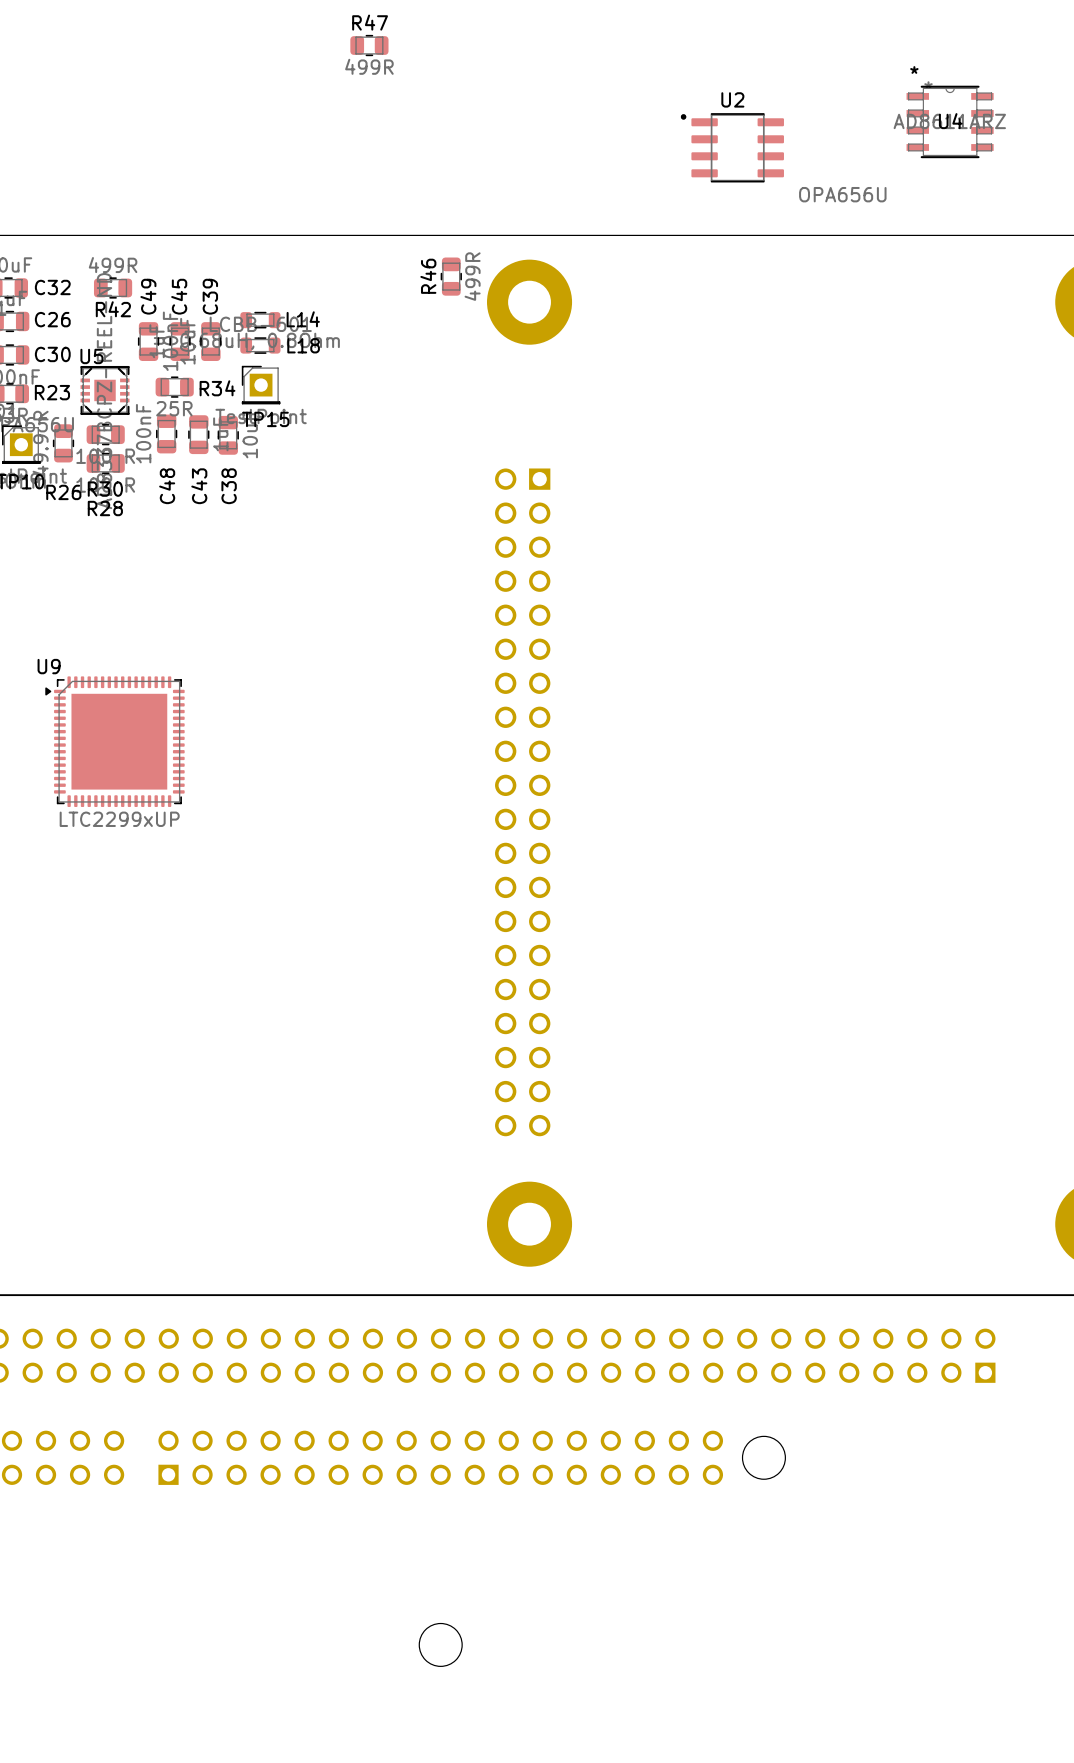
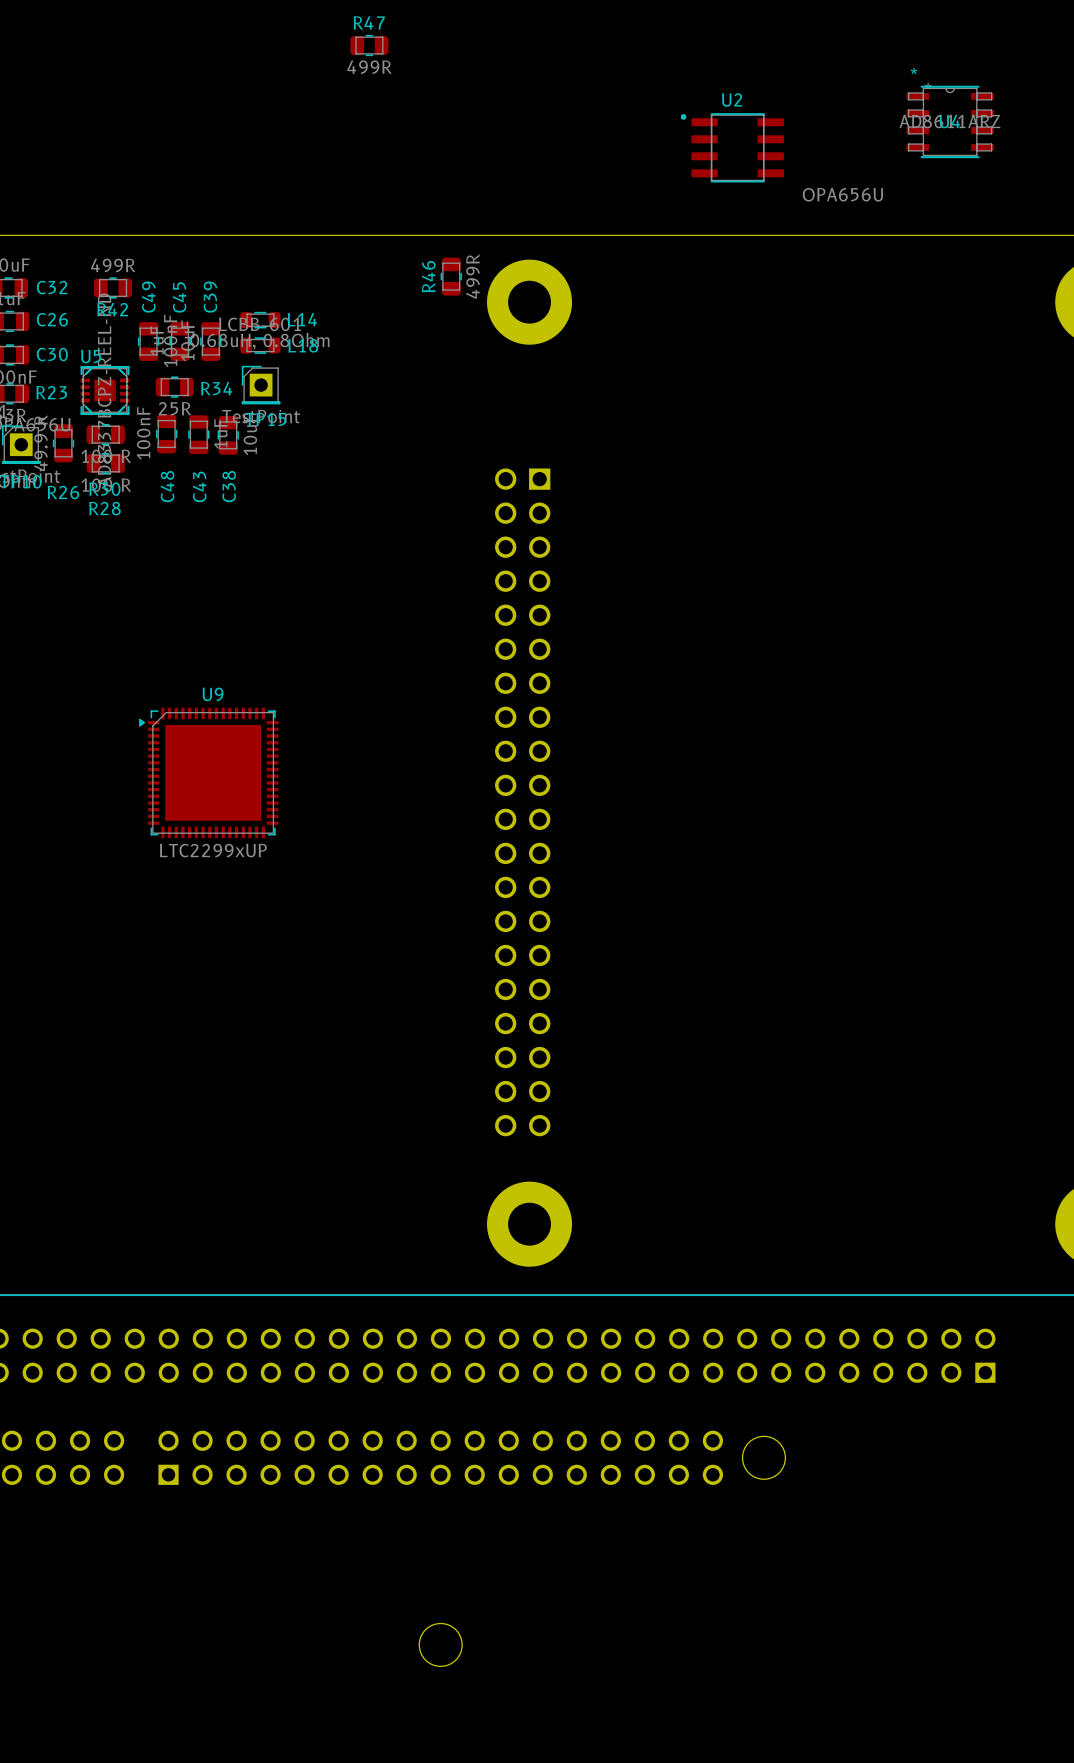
U9 name position: U9 (49, 666) -> U9 (213, 694)
U9 position: (114, 741) -> (208, 772)

